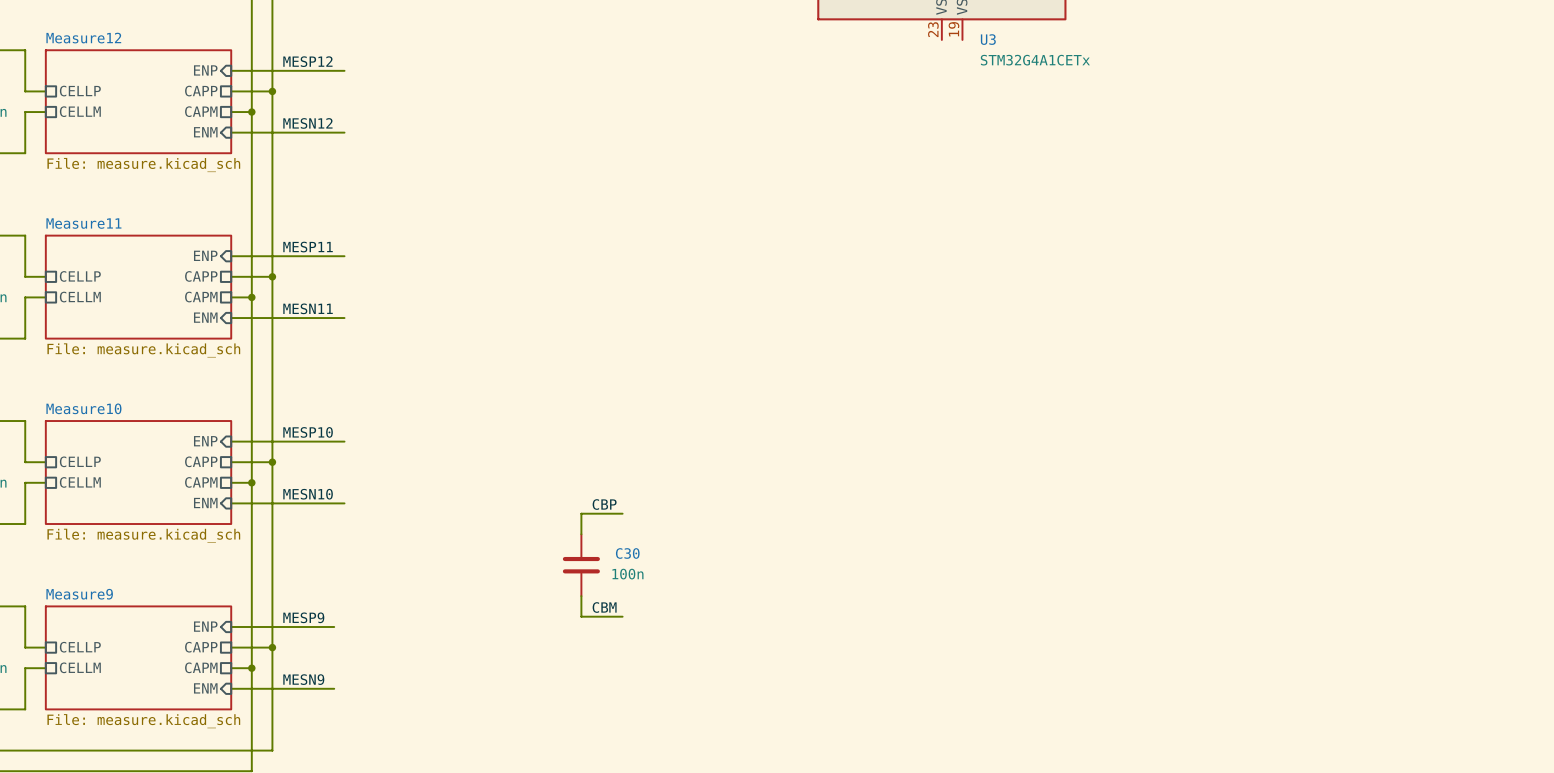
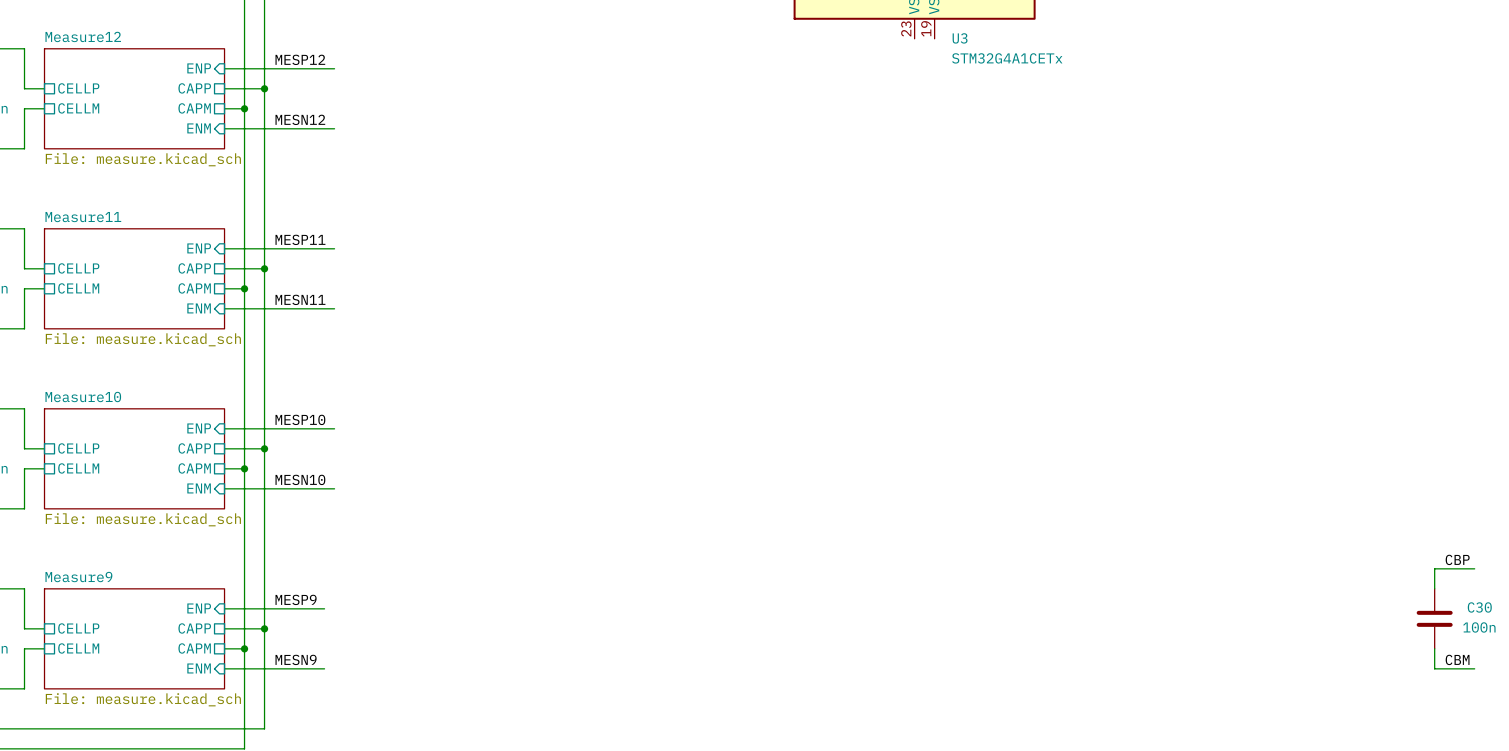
label: CBP (604, 504) -> none
wire: (622, 513) (581, 513) (581, 534) -> none
C30 position: (581, 565) -> (1434, 618)
label: none -> CBP (1457, 559)
wire: none -> (1474, 568) (1434, 568) (1434, 588)
wire: (581, 596) (581, 616) (622, 616) -> none
label: CBM (604, 607) -> none
wire: none -> (1434, 648) (1434, 668) (1474, 668)
label: none -> CBM (1457, 659)

